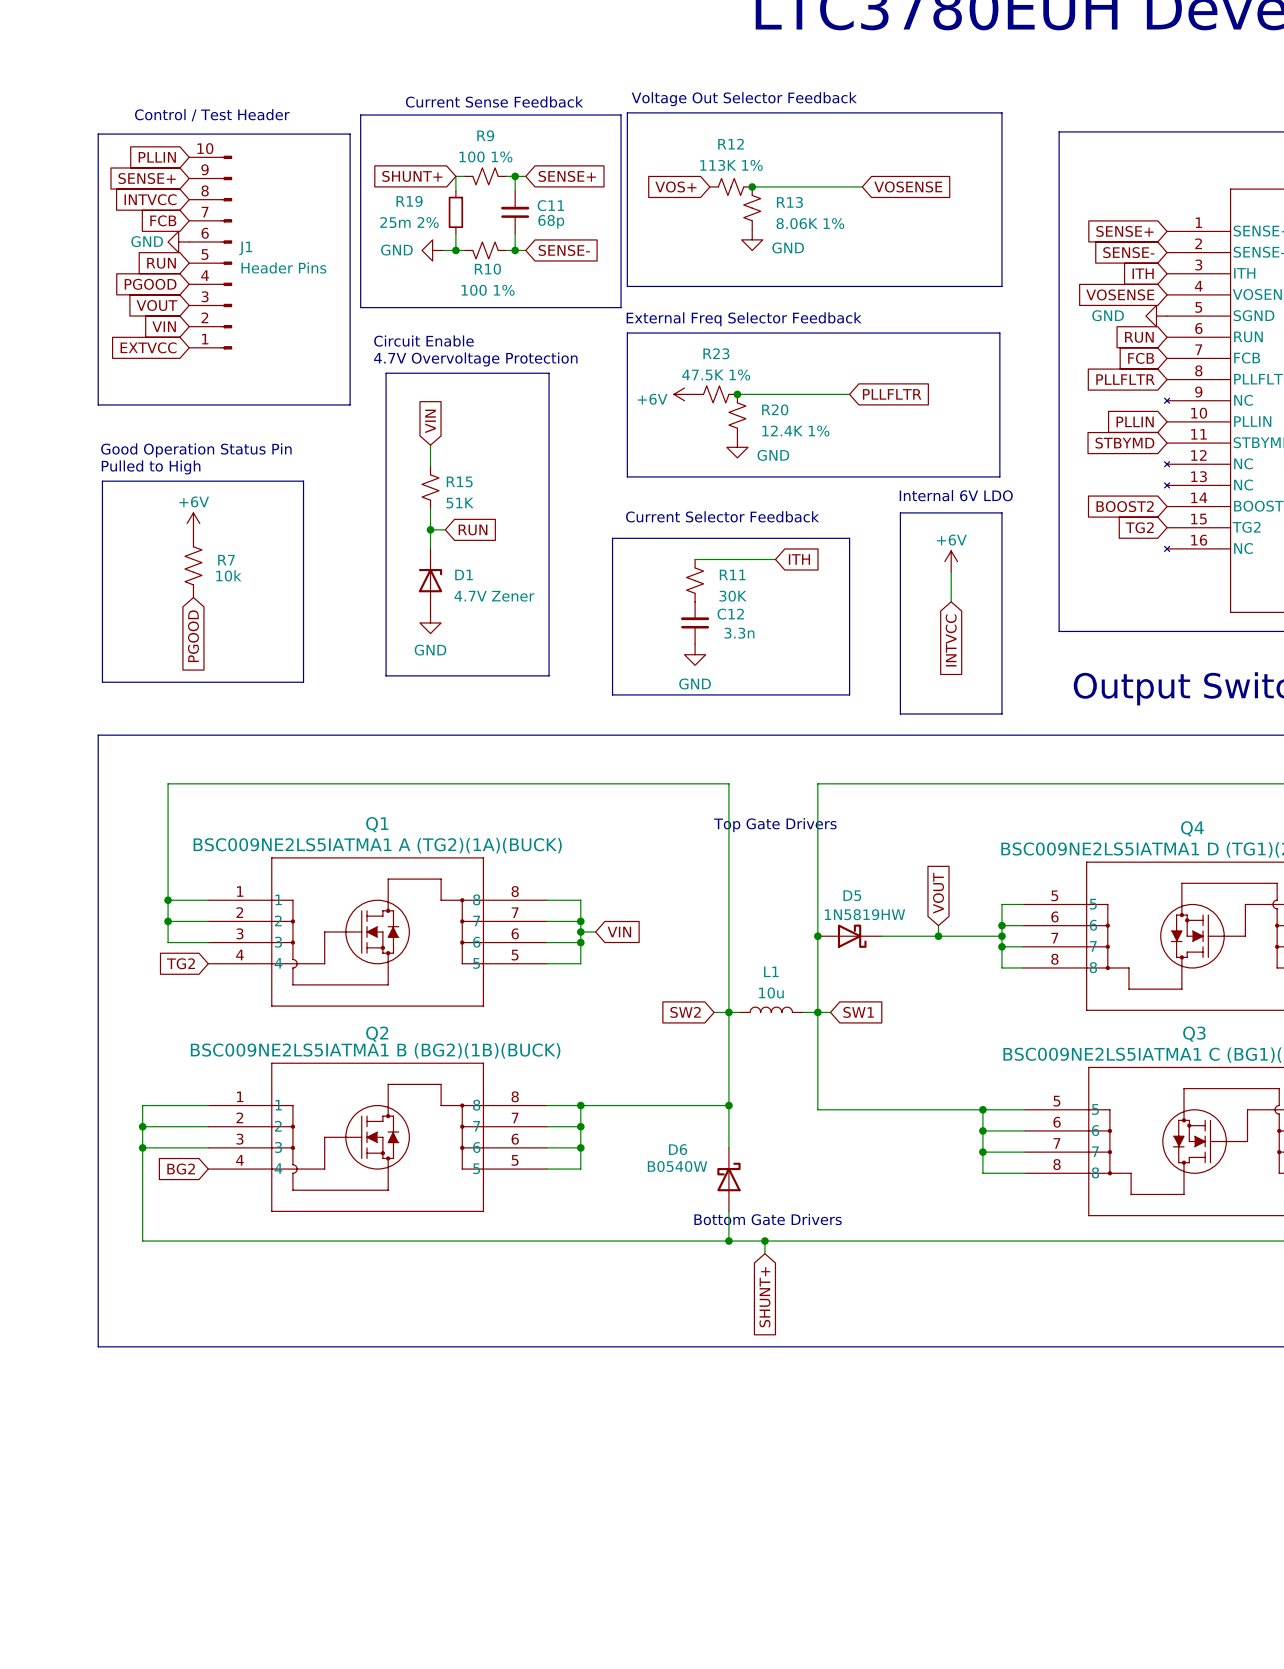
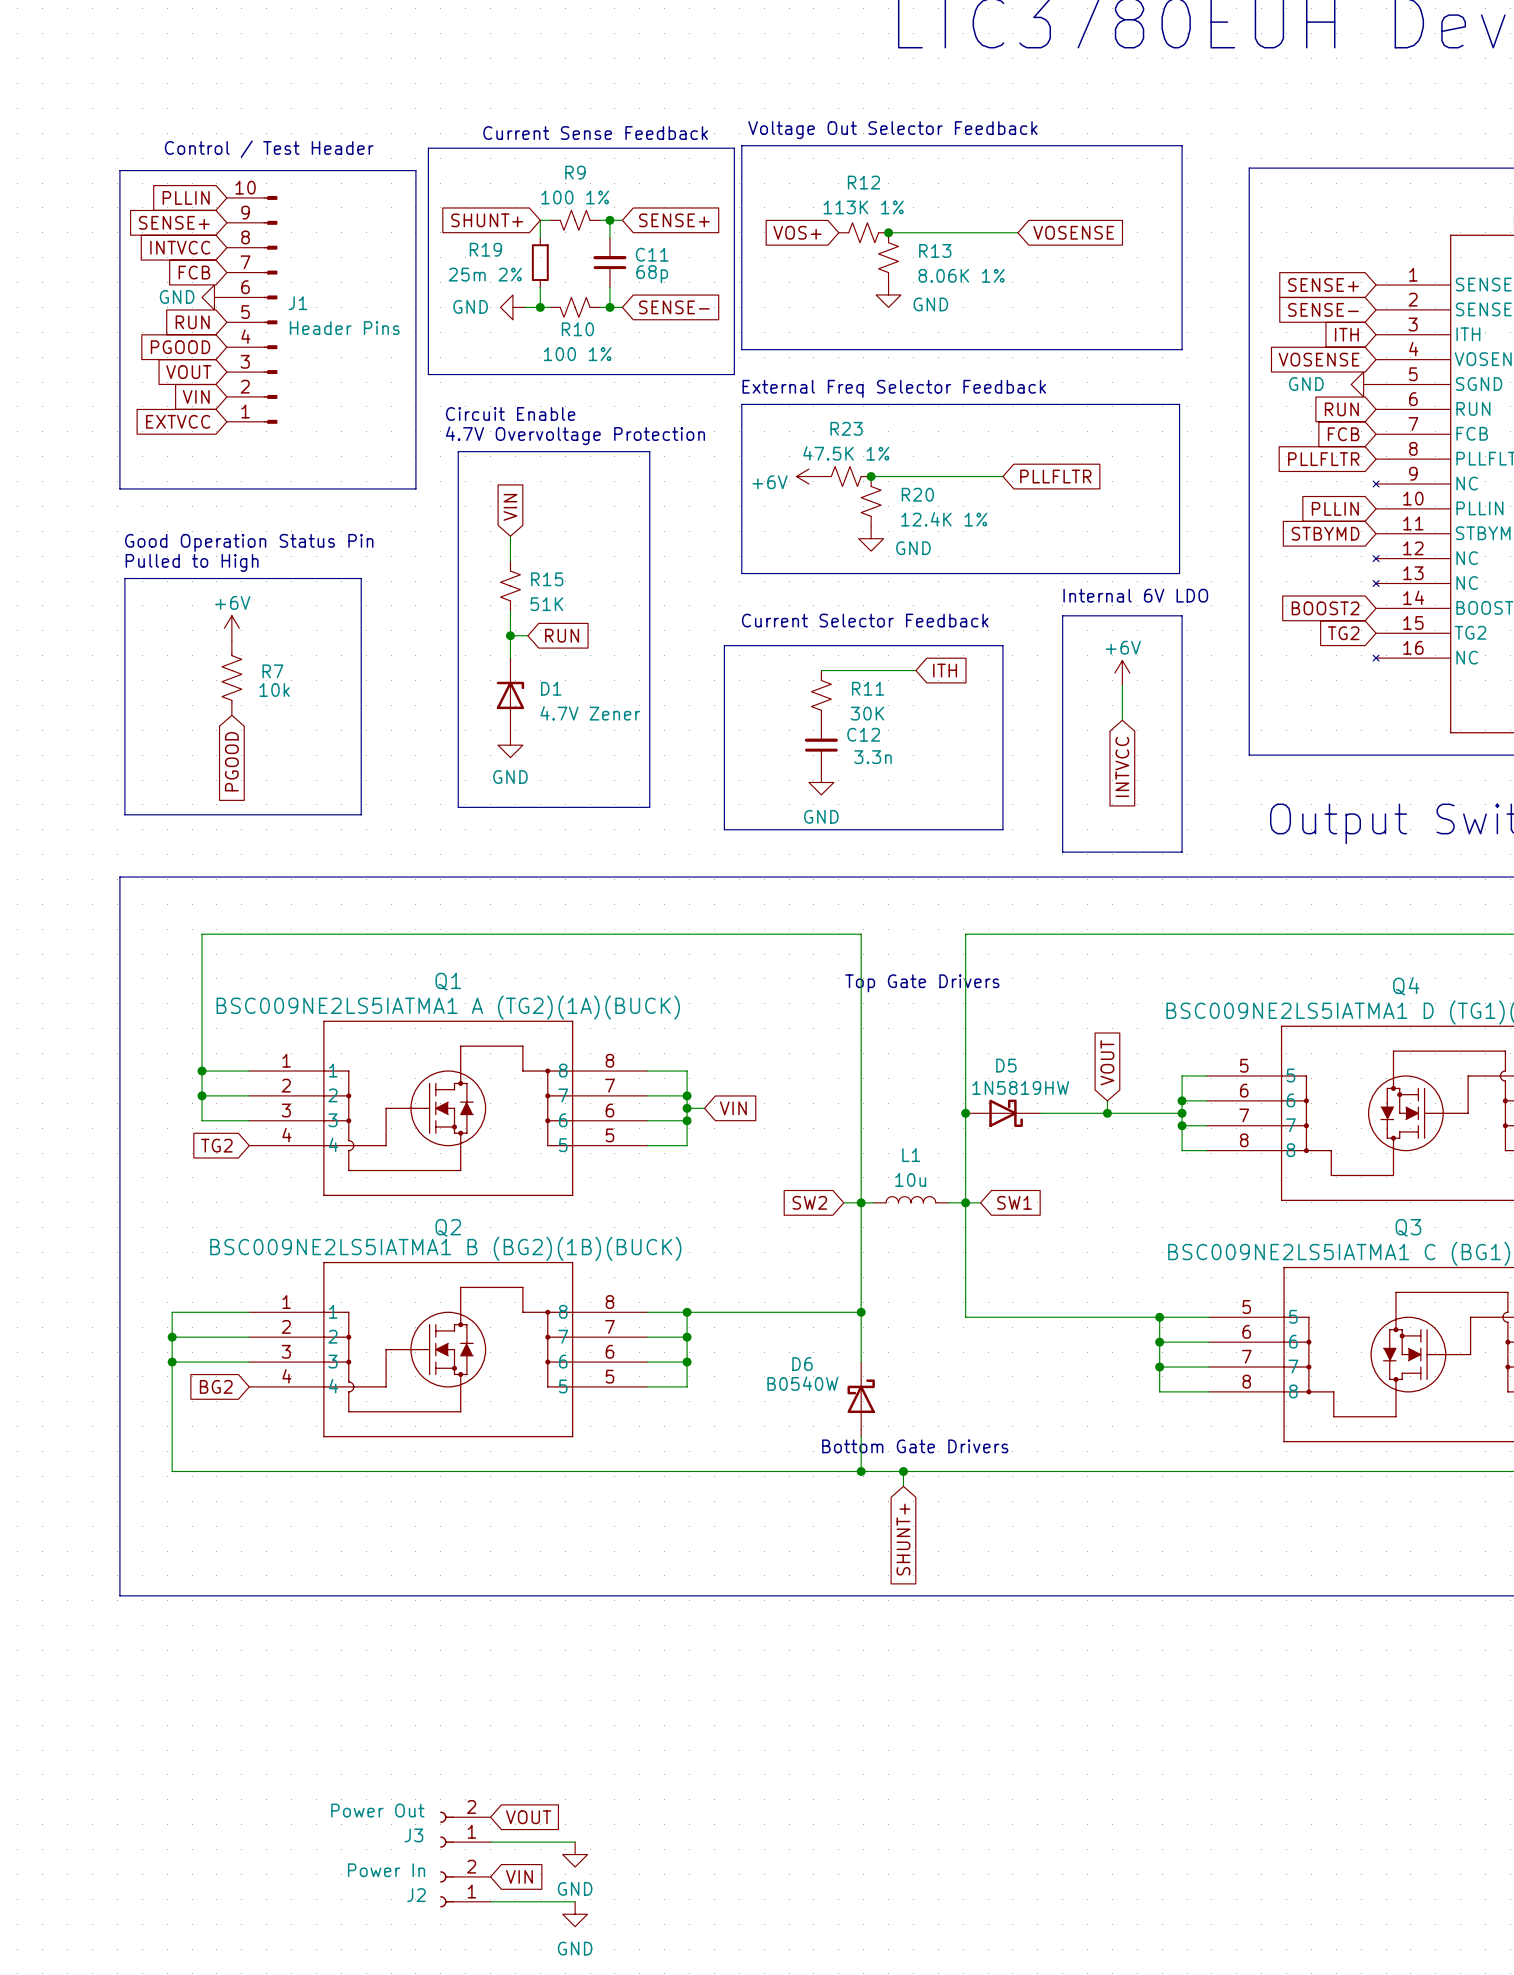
global label: none -> VOUT (528, 1817)
J3: none -> Power Out (465, 1829)
wire: none -> (490, 1842) (575, 1842)
power symbol: none -> GND (575, 1854)
global label: none -> VIN (519, 1876)
J2: none -> Power In (465, 1889)
wire: none -> (490, 1901) (575, 1901)
power symbol: none -> GND (575, 1914)

